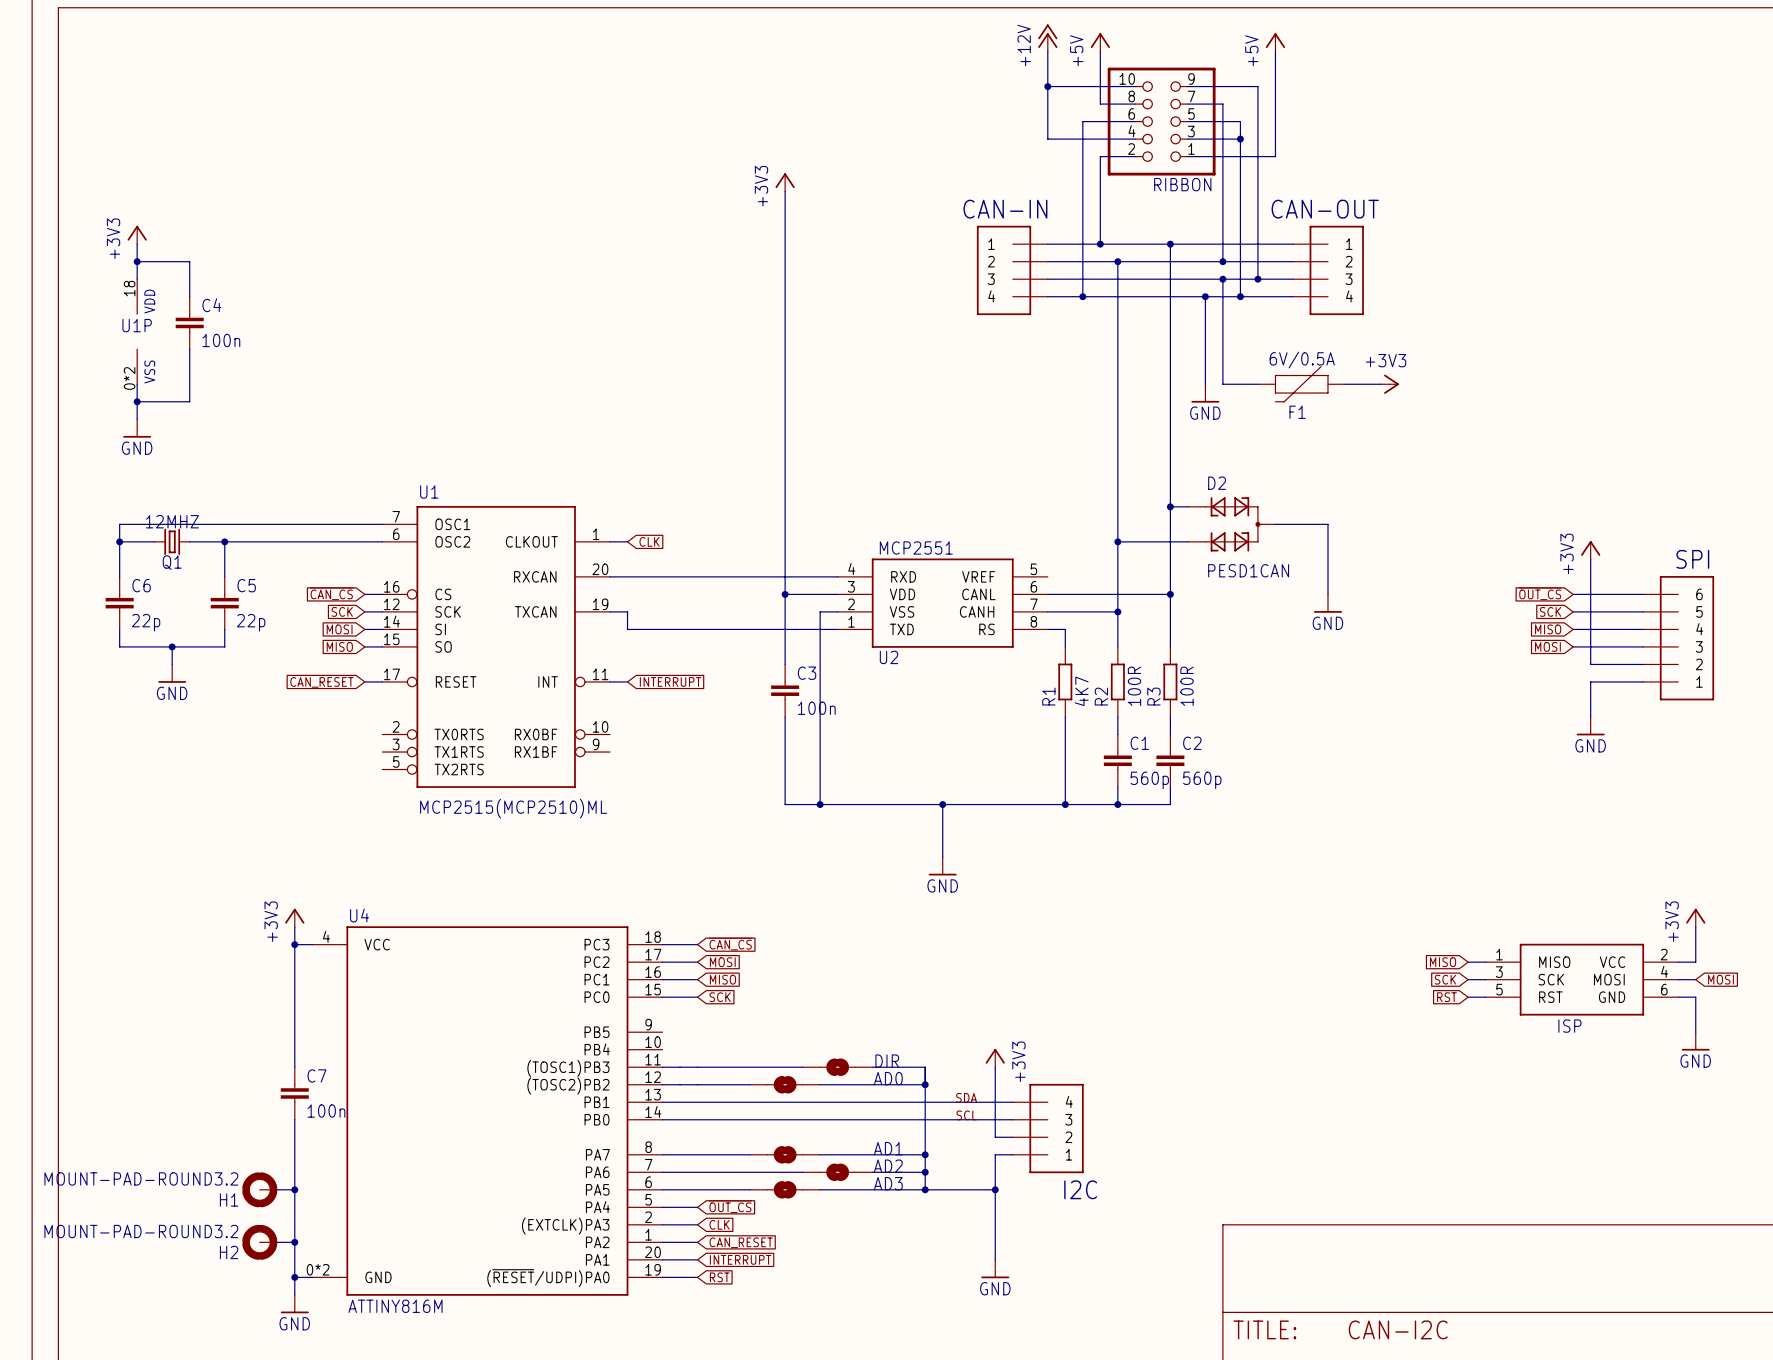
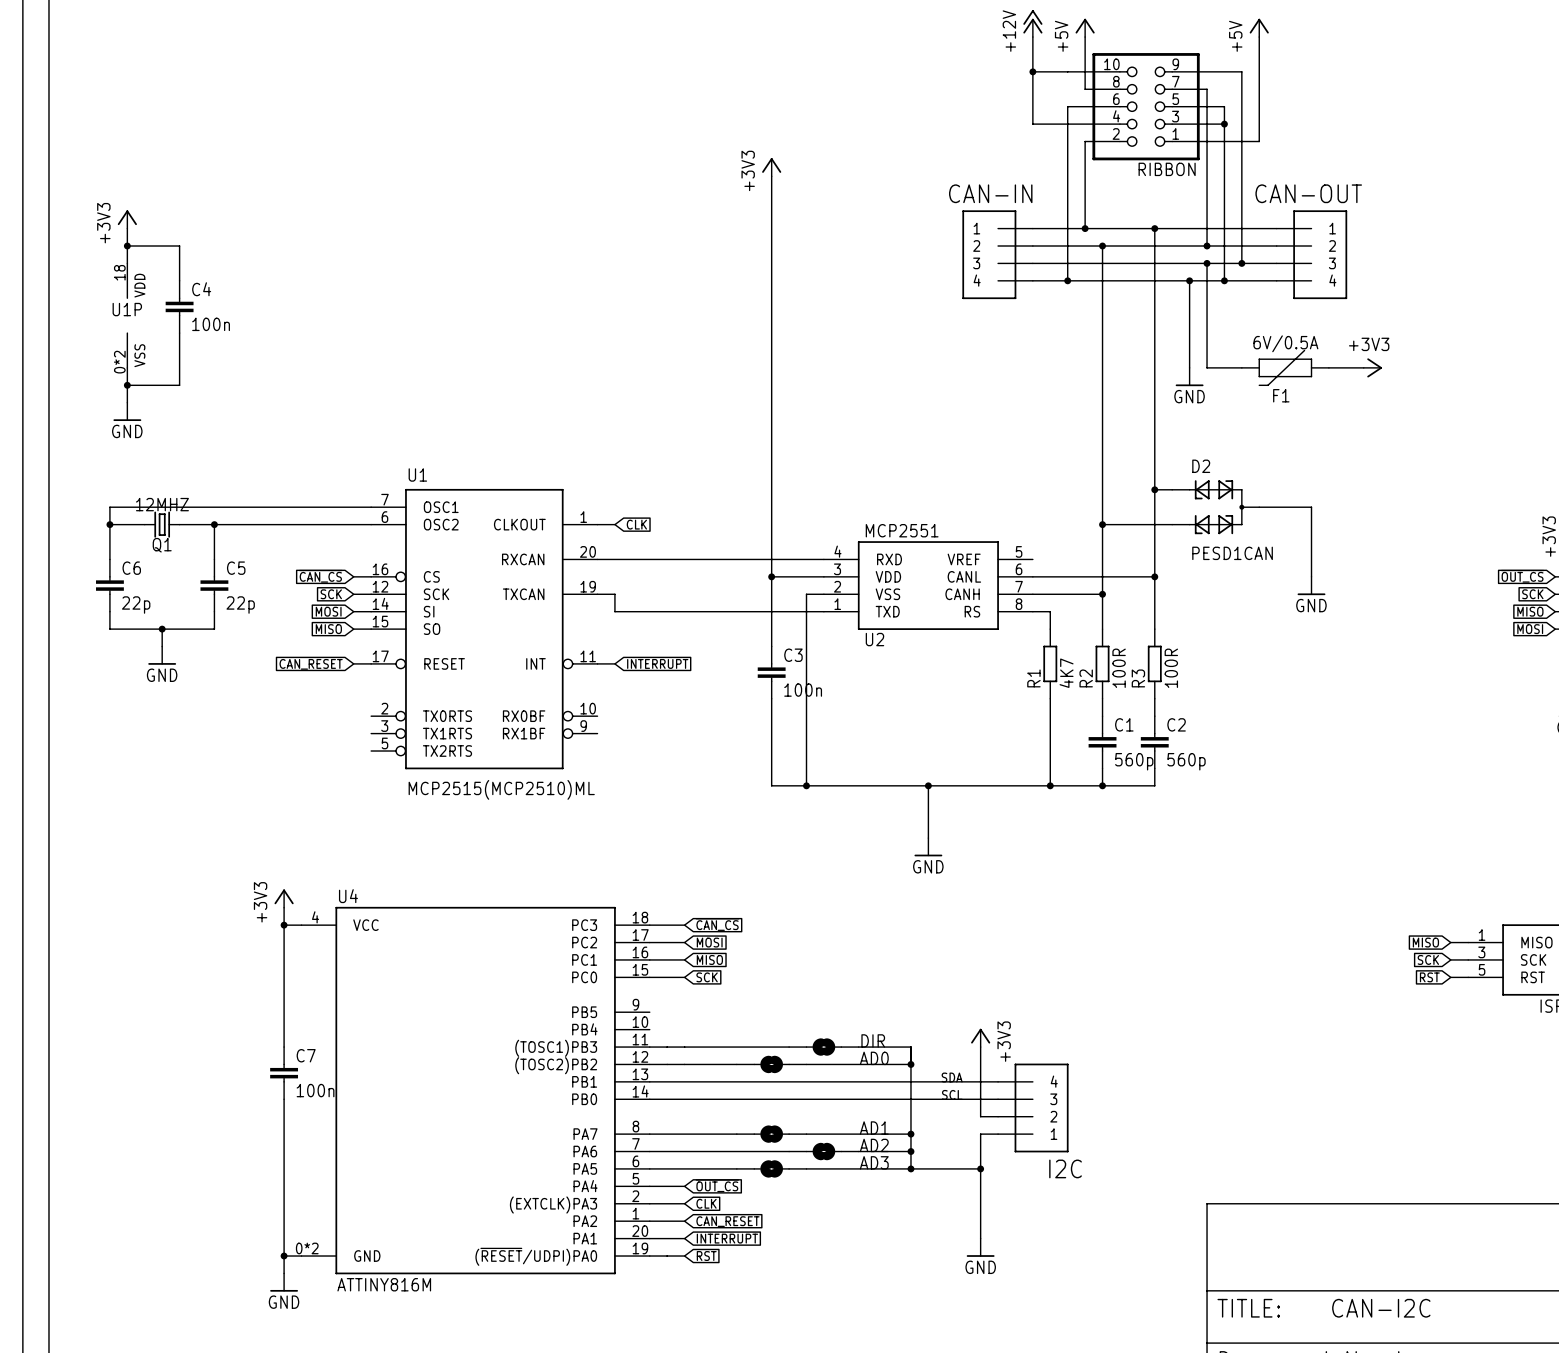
H1: MOUNT-PAD-ROUND3.2 (259, 1189) -> none
wire: (277, 1189) (294, 1189) -> none
junction: (294, 1189) -> none
H2: MOUNT-PAD-ROUND3.2 (259, 1242) -> none
wire: (277, 1242) (294, 1242) -> none
junction: (294, 1242) -> none

